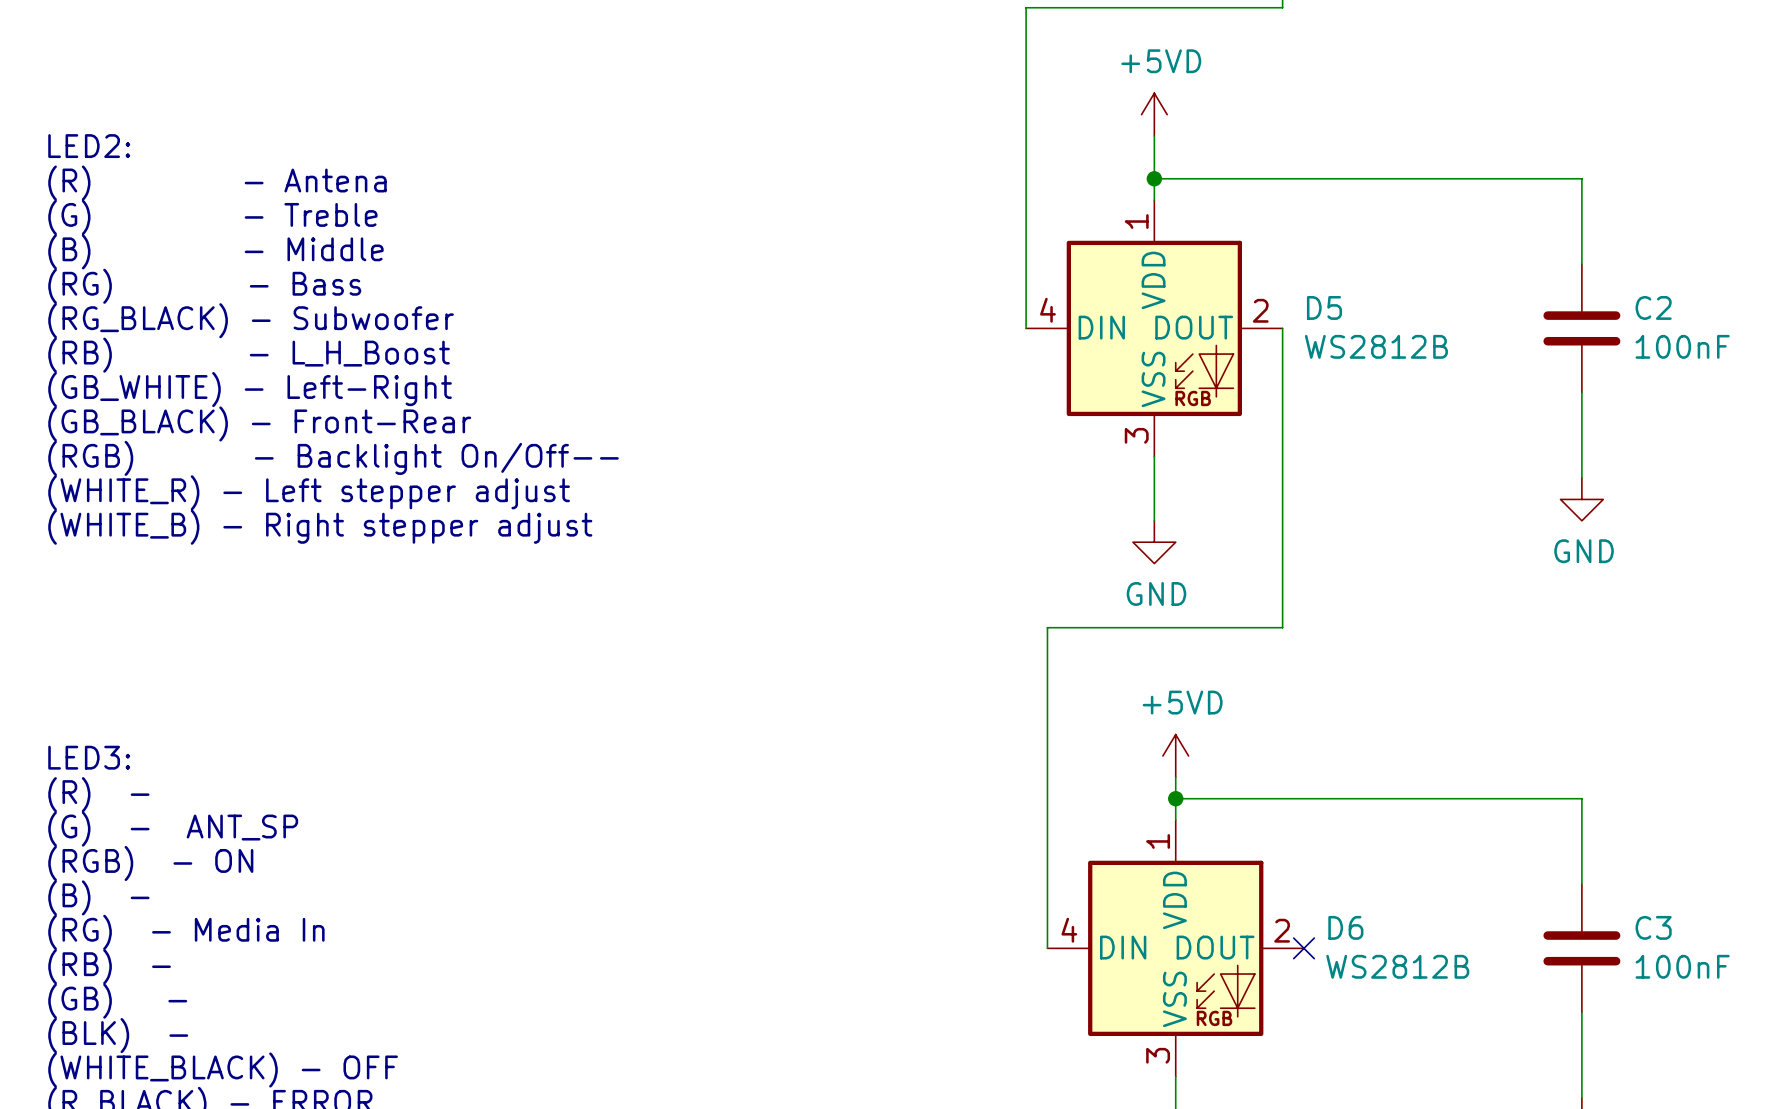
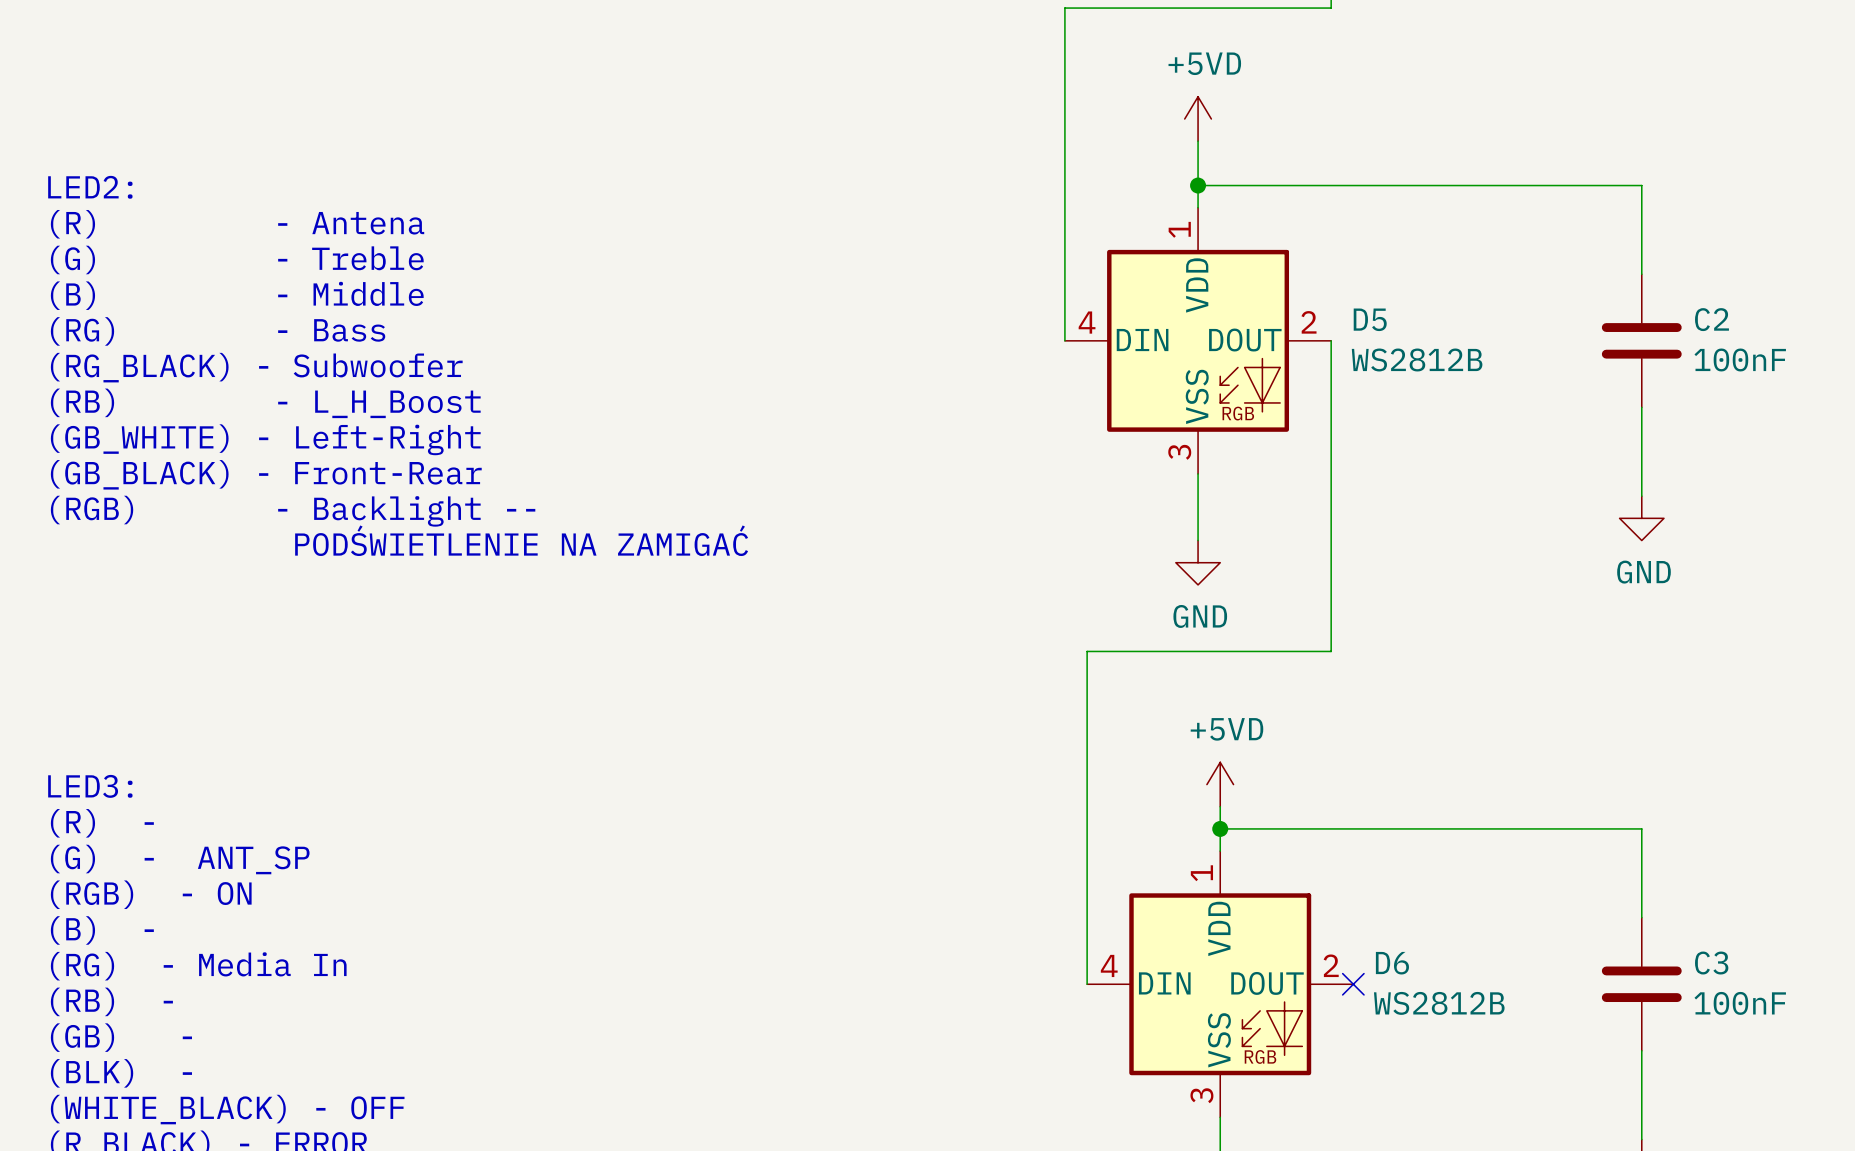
text: LED2: (89, 146) -> none
text: (R) - Antena (217, 183) -> LED2: (90, 187)
text: (G) - Treble (212, 217) -> (R) - Antena (237, 224)
text: (B) - Middle (215, 251) -> (G) - Treble (237, 259)
text: (RG) - Bass (204, 286) -> (B) - Middle (237, 295)
text: (RG_BLACK) - Subwoofer (251, 320) -> (RG) - Bass (218, 331)
text: (RB) - L_H_Boost (249, 355) -> (RG_BLACK) - Subwoofer (256, 367)
text: (GB_WHITE) - Left-Right (250, 389) -> (RB) - L_H_Boost (265, 403)
text: (GB_BLACK) - Front-Rear (259, 423) -> (GB_WHITE) - Left-Right (265, 439)
text: (RGB) - Backlight On/Off-- (333, 458) -> (GB_BLACK) - Front-Rear (266, 474)
text: (WHITE_R) - Left stepper adjust (309, 492) -> (RGB) - Backlight -- (293, 511)
text: (WHITE_B) - Right stepper adjust (320, 527) -> PODŚWIETLENIE NA ZAMIGAĆ (521, 540)

